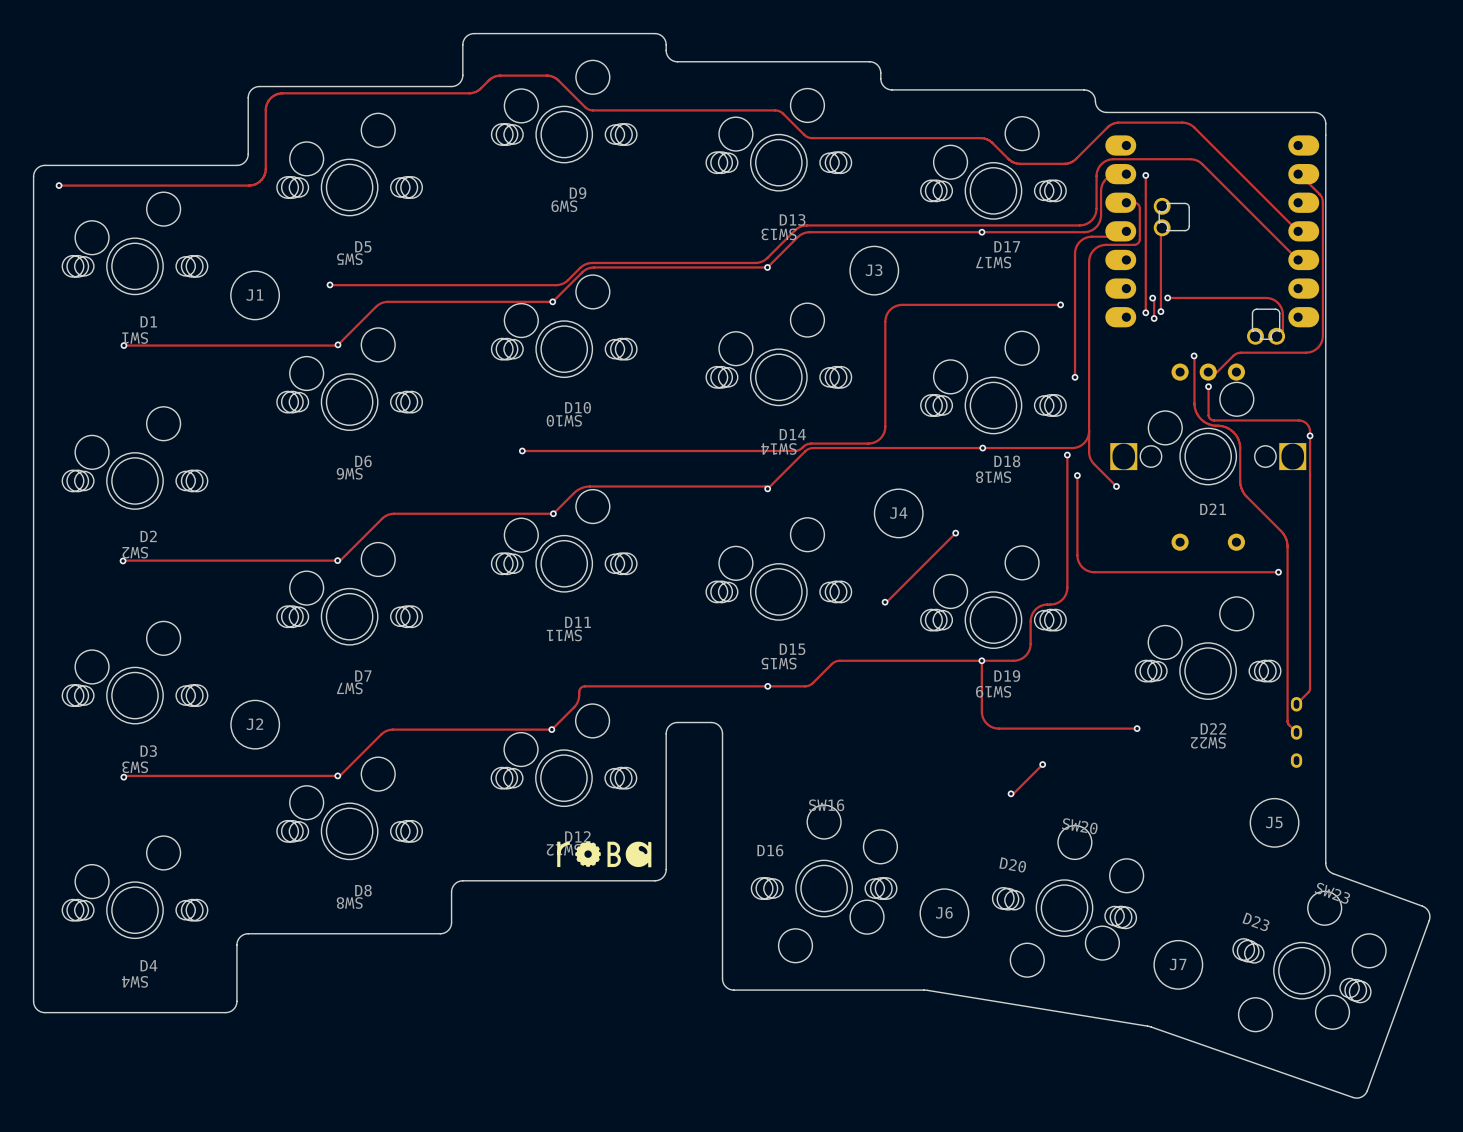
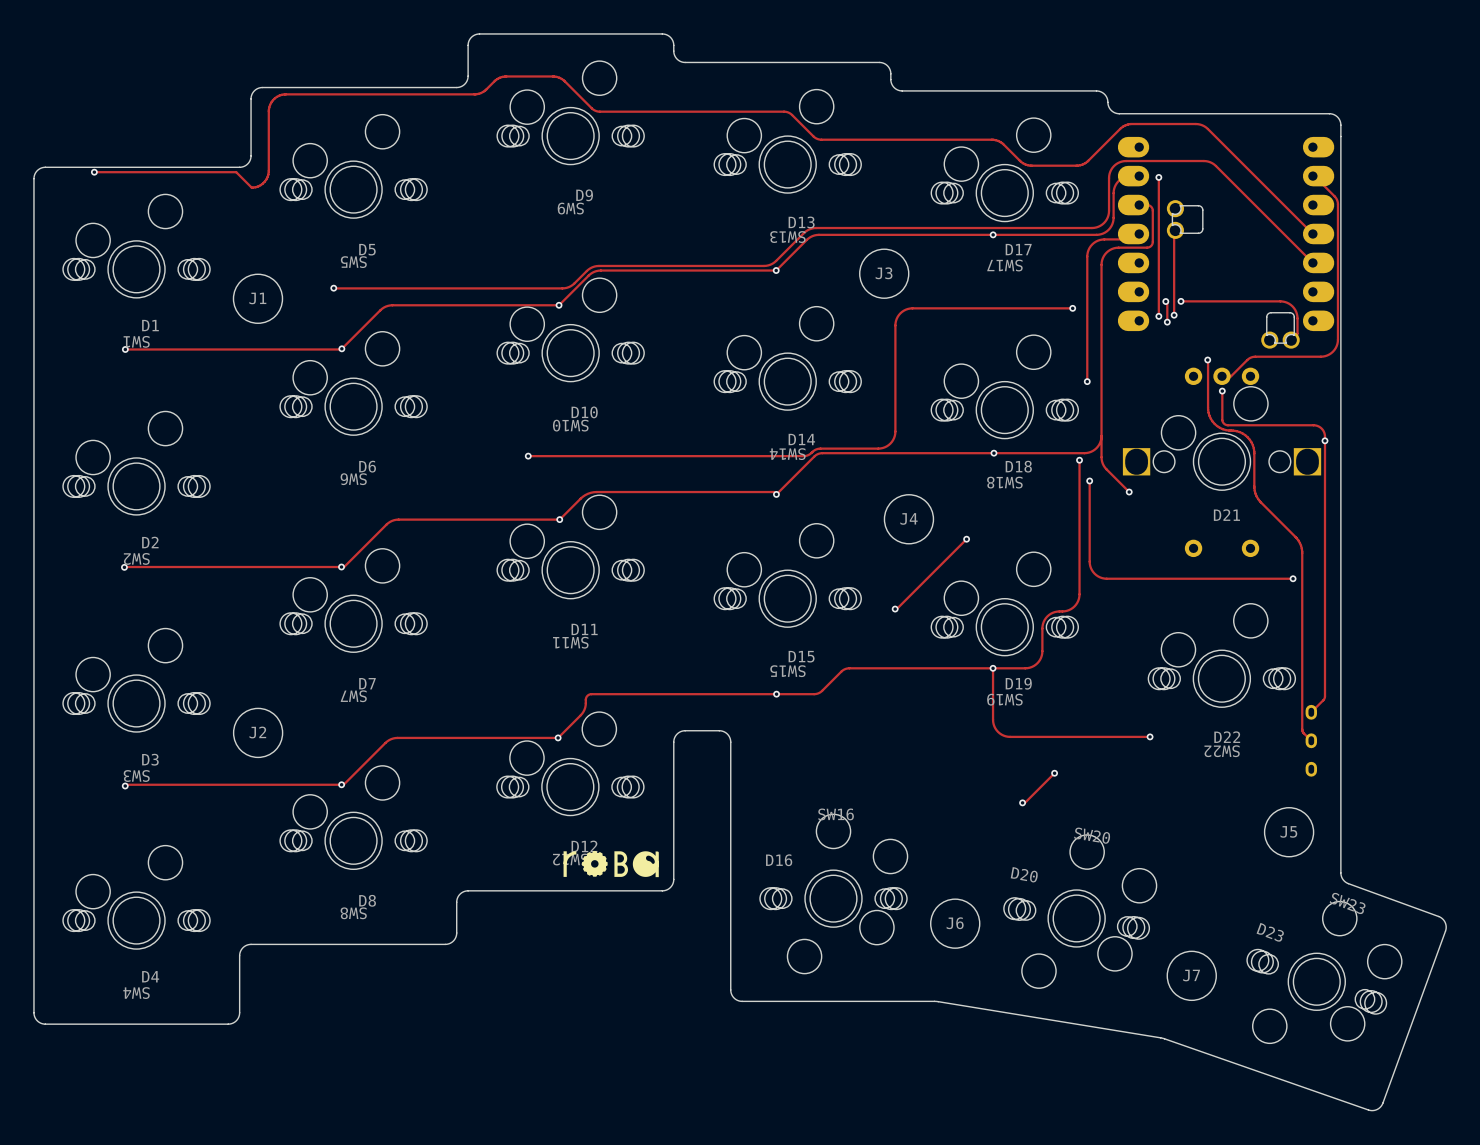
track: (59, 185) (248, 185) -> (94, 172) (236, 172) (251, 187)
via position: (59, 185) -> (94, 172)

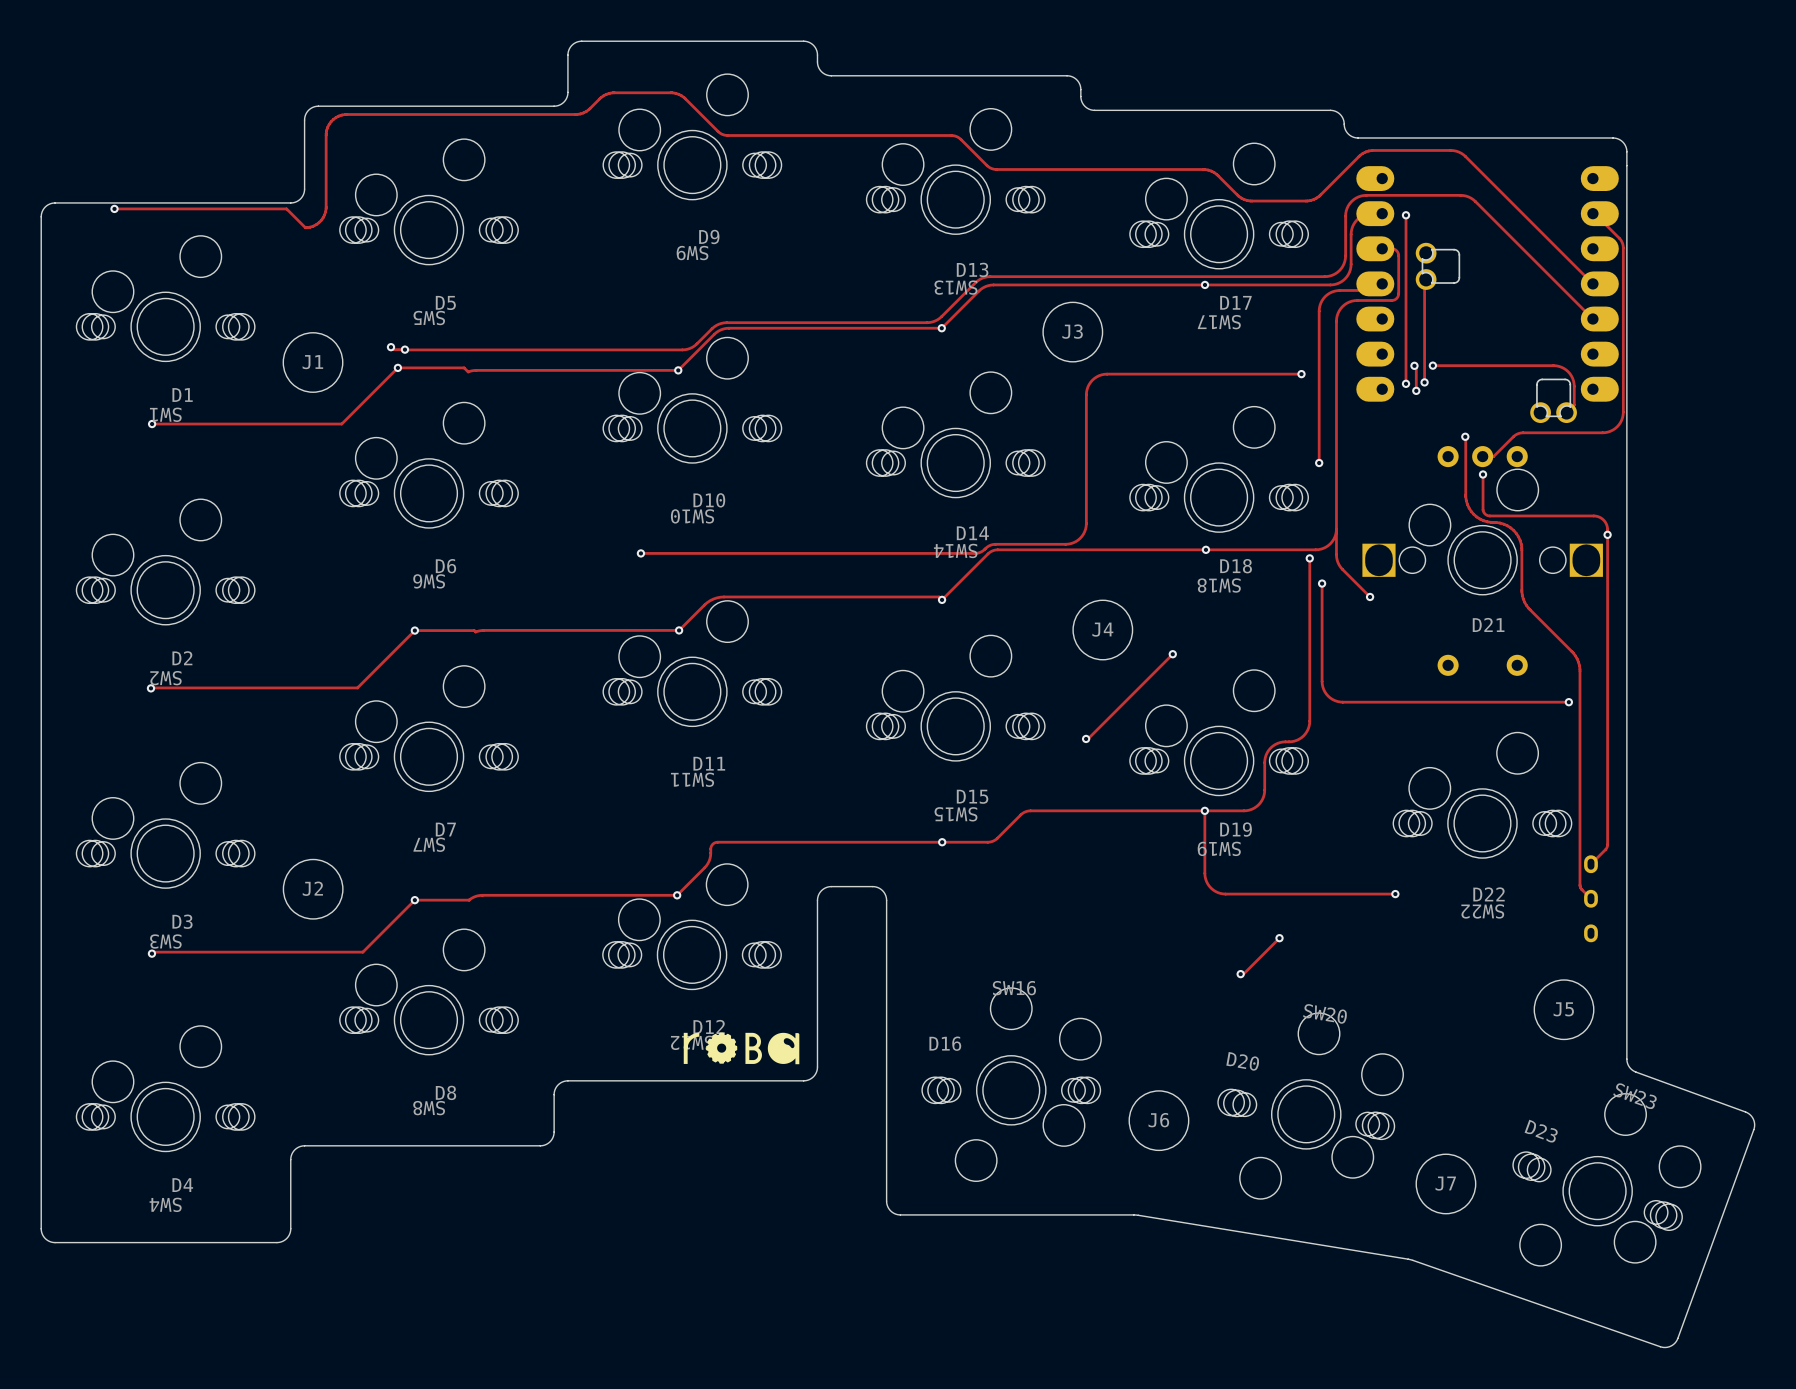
track: none -> (390, 347) (393, 349) (404, 349)
via: none -> (390, 347)
via: none -> (397, 367)
track: (392, 305) (382, 308) (341, 349) (281, 349) -> (476, 370) (468, 371) (464, 367) (397, 367) (341, 424)
via: (341, 348) -> none
track: (398, 519) (388, 523) (344, 567) (294, 567) -> (483, 630) (475, 632) (414, 630) (357, 687)
via position: (341, 567) -> (414, 630)
track: (397, 737) (387, 741) (343, 784) (299, 784) -> (482, 895) (469, 900) (414, 900) (362, 952)
via position: (341, 784) -> (414, 900)

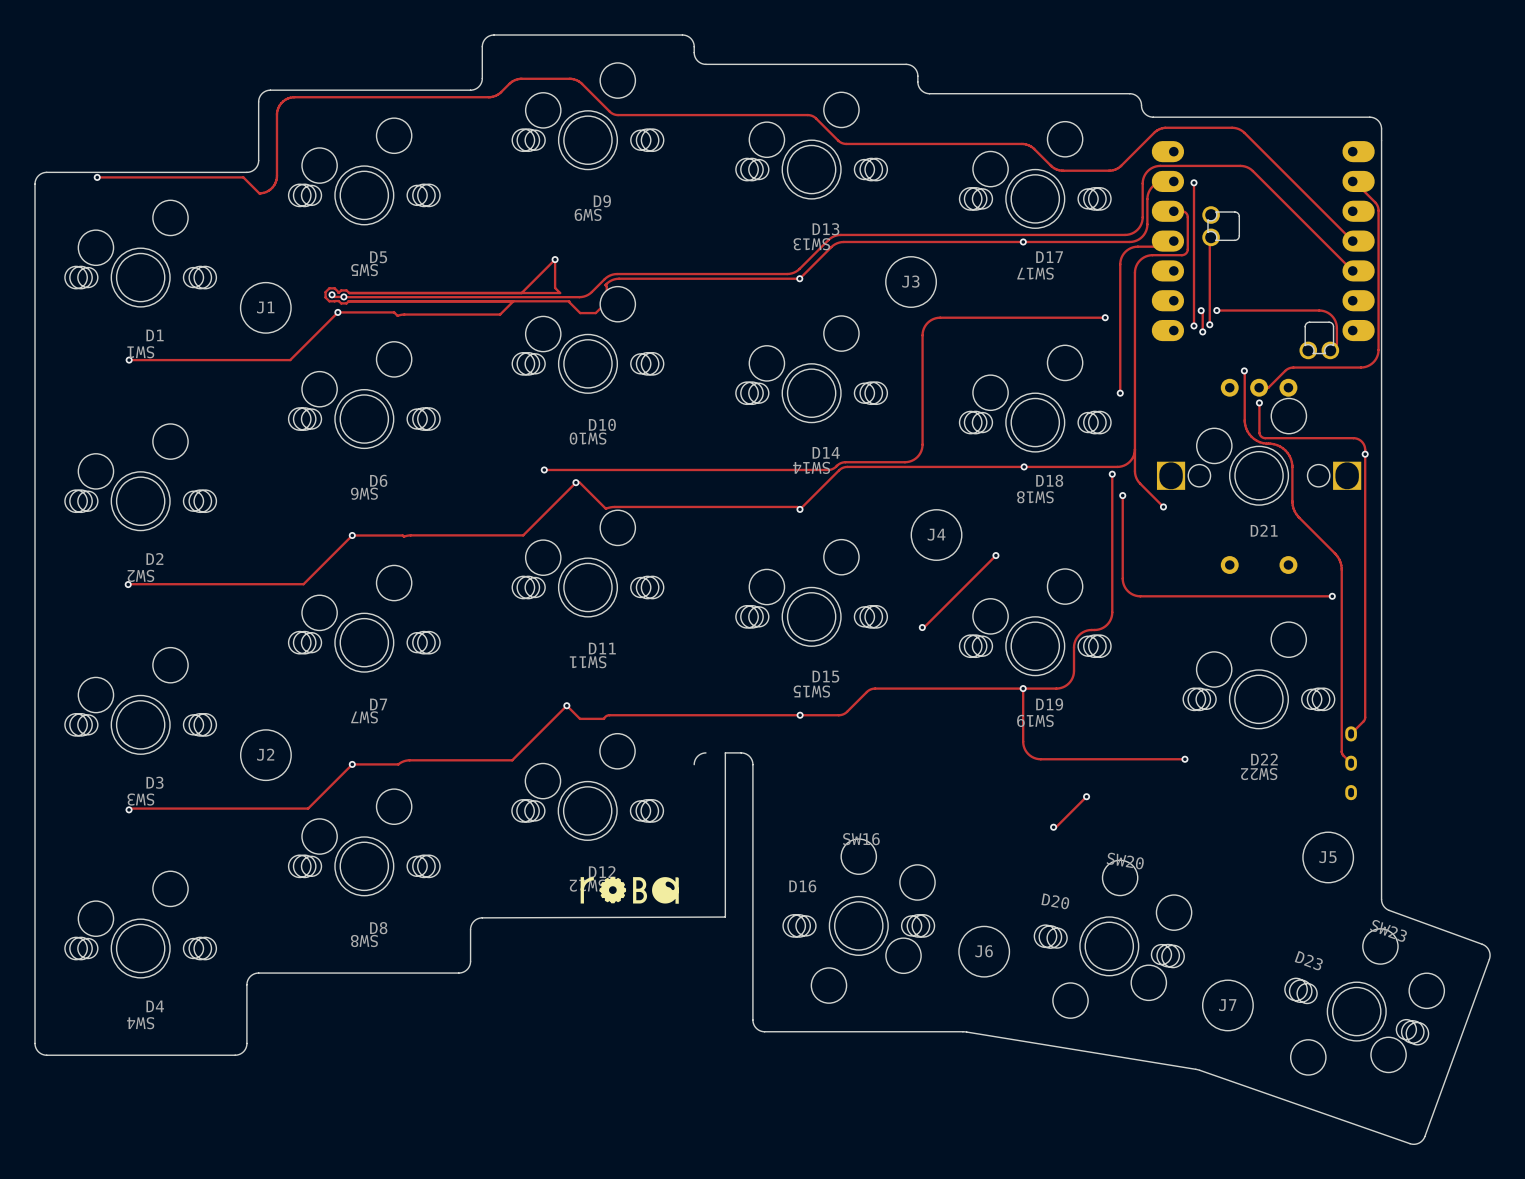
track: (712, 335) (678, 370) (588, 370) -> (605, 285) (606, 302) (595, 313) (580, 313) (569, 301) (348, 301) (341, 303) (338, 301) (329, 301) (325, 297) (325, 292) (329, 288) (334, 288) (338, 292) (346, 290) (349, 293) (560, 293) (555, 287) (555, 259) (521, 293)
track: none -> (513, 301) (500, 314)
via position: (678, 370) -> (555, 259)
track: (724, 596) (707, 602) (679, 630) (616, 630) -> (614, 506) (605, 508) (579, 482) (575, 482) (523, 535)
via position: (679, 630) -> (575, 482)
track: (717, 842) (711, 846) (710, 858) (706, 865) (677, 895) (603, 895) -> (609, 715) (604, 718) (579, 718) (566, 705) (512, 760)
board edge: (831, 886) (854, 886) -> none
via position: (677, 895) -> (566, 705)
board edge: (817, 900) (817, 1067) (812, 1077) (803, 1080) (567, 1080) -> (725, 752) (725, 917) (482, 917)

